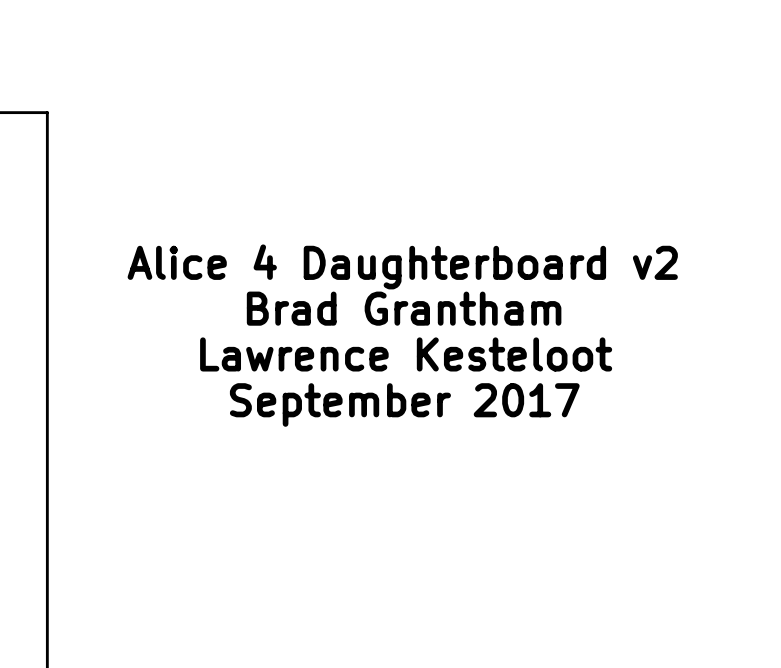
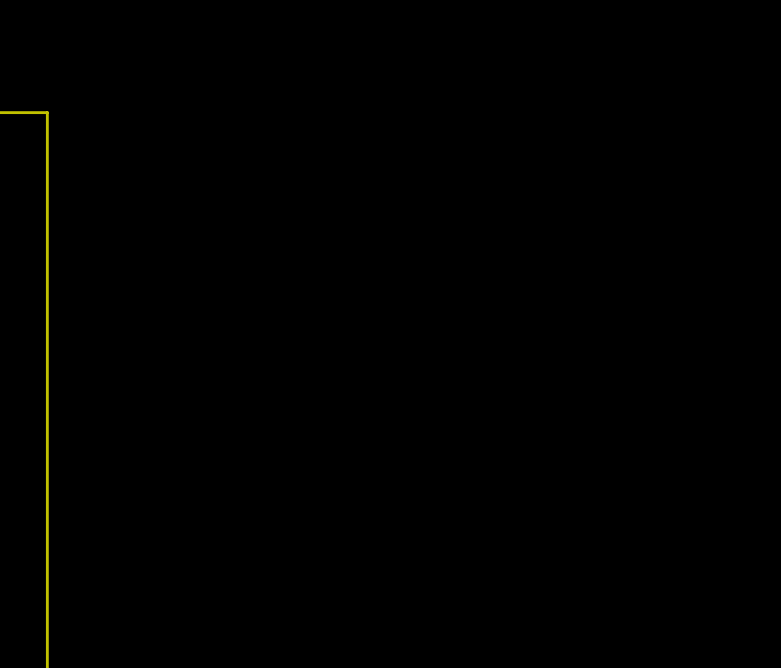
text: Alice 4 Daughterboard v2 (402, 266) -> none
text: Brad Grantham (404, 308) -> none
text: Lawrence Kesteloot (406, 354) -> none
text: September 2017 (404, 404) -> none

